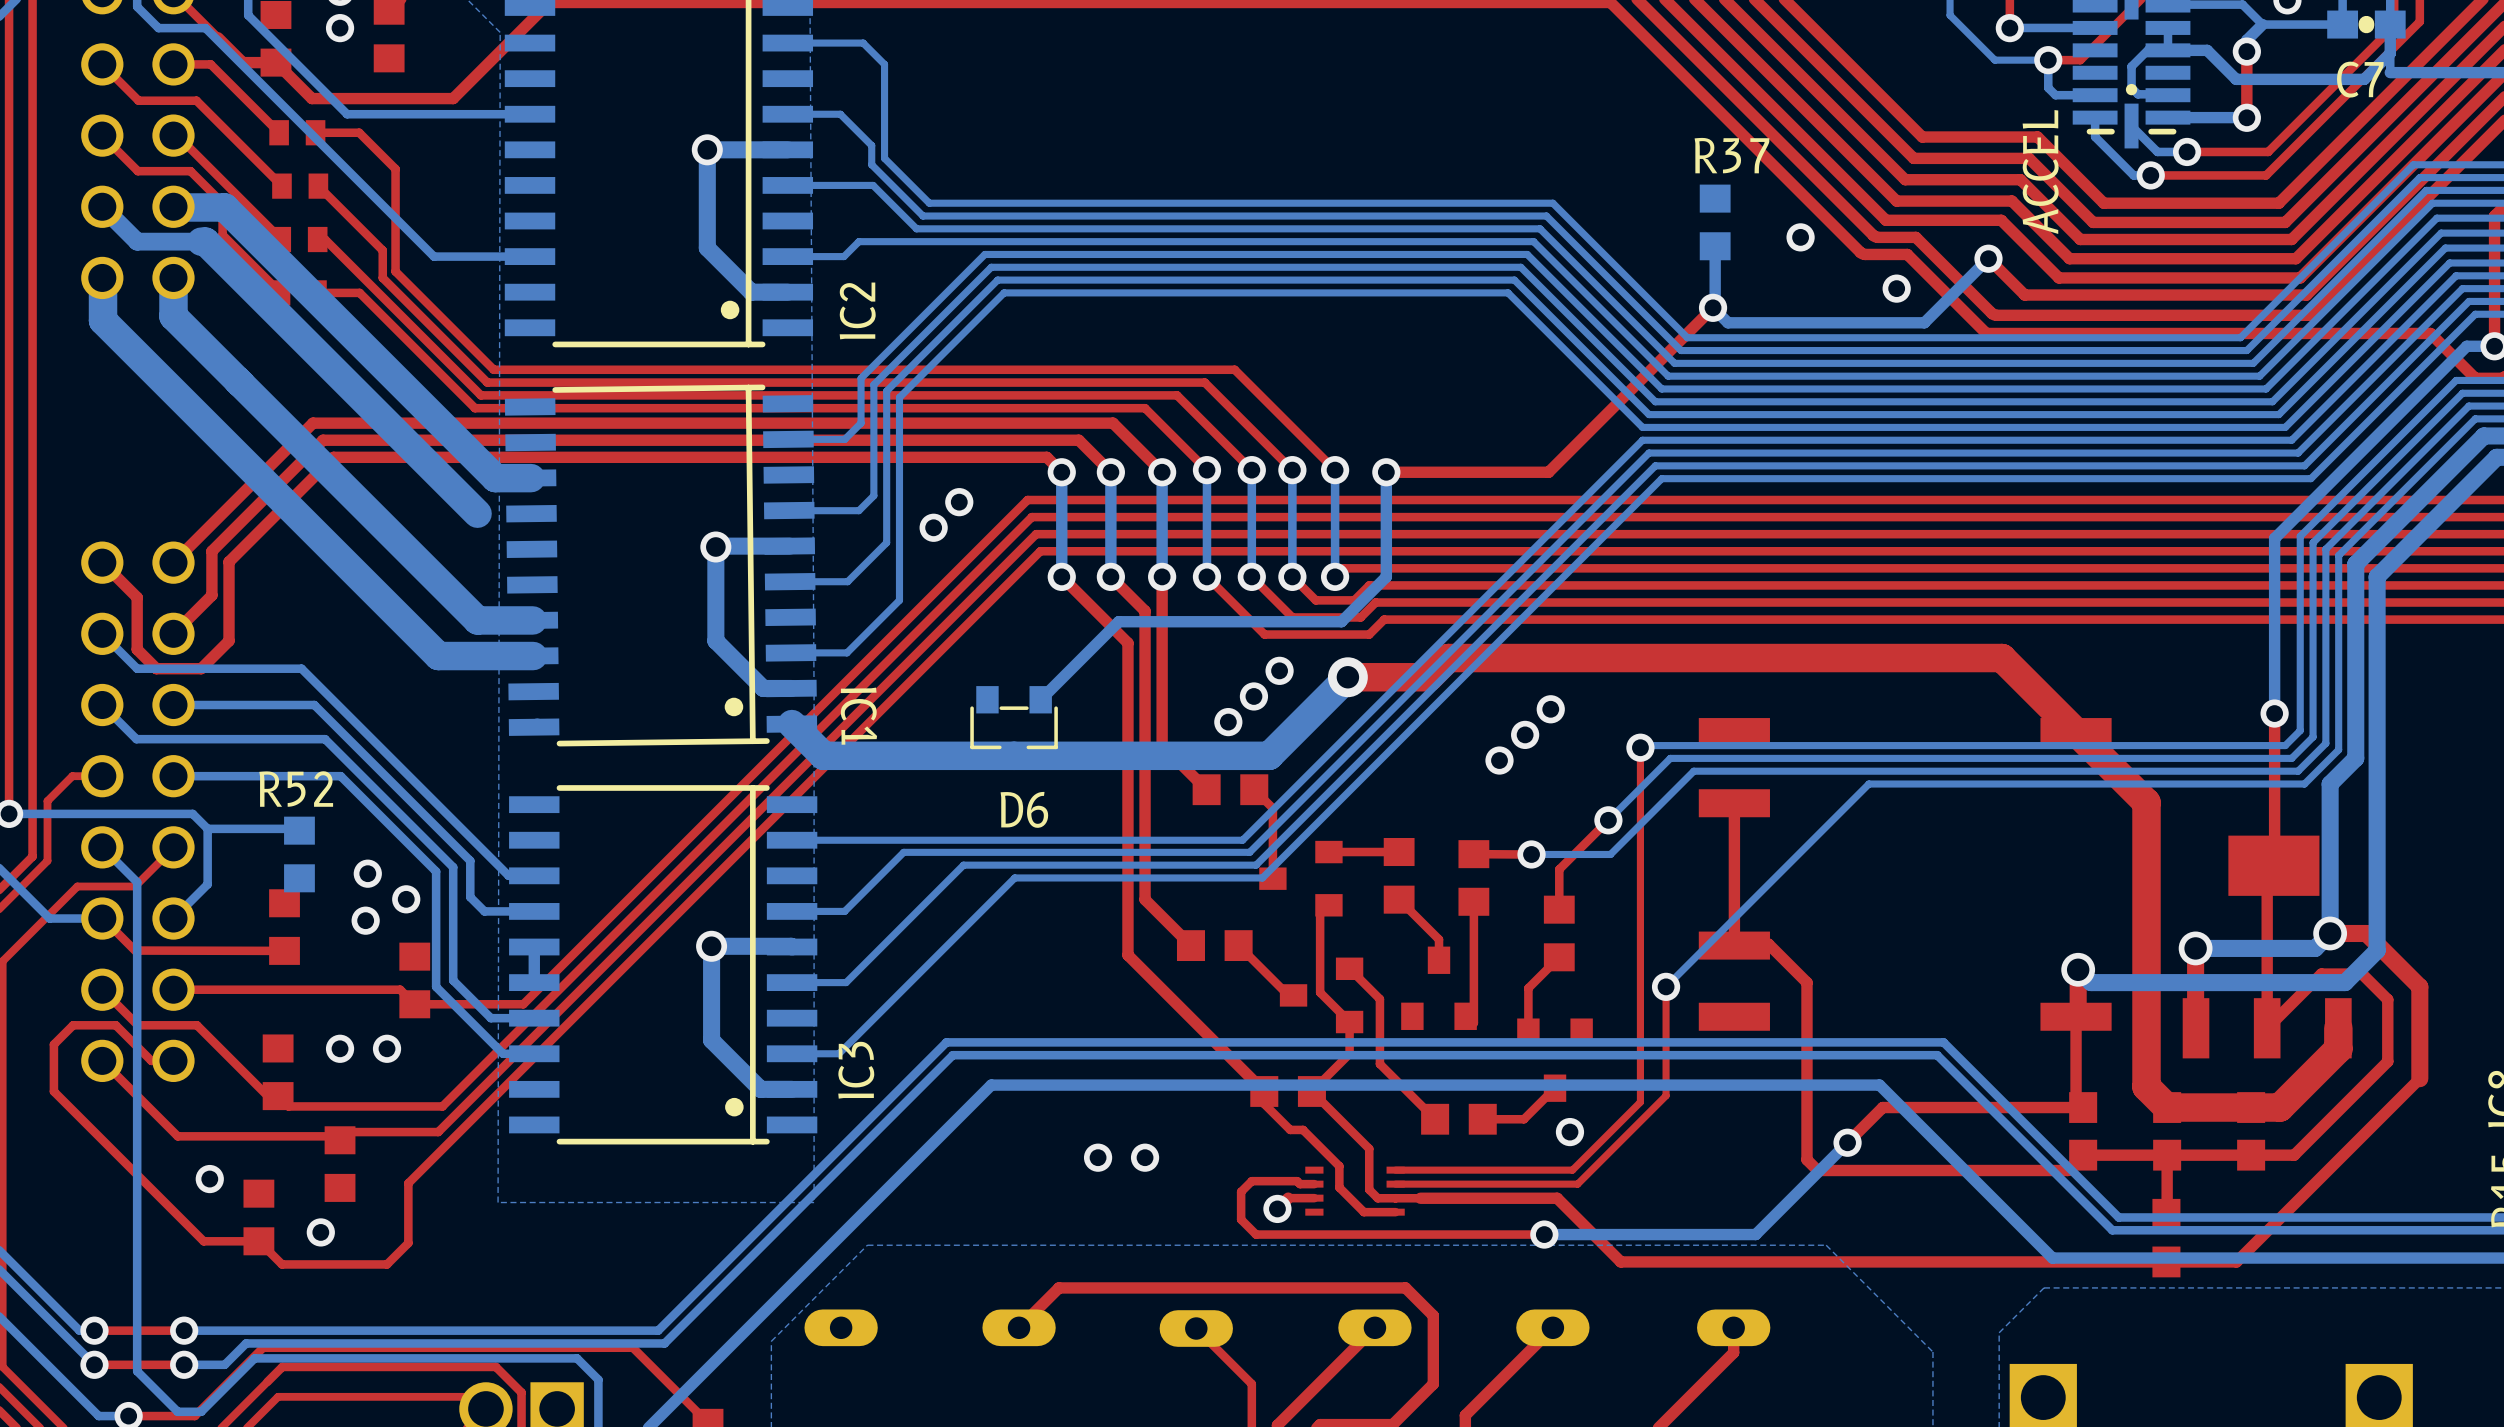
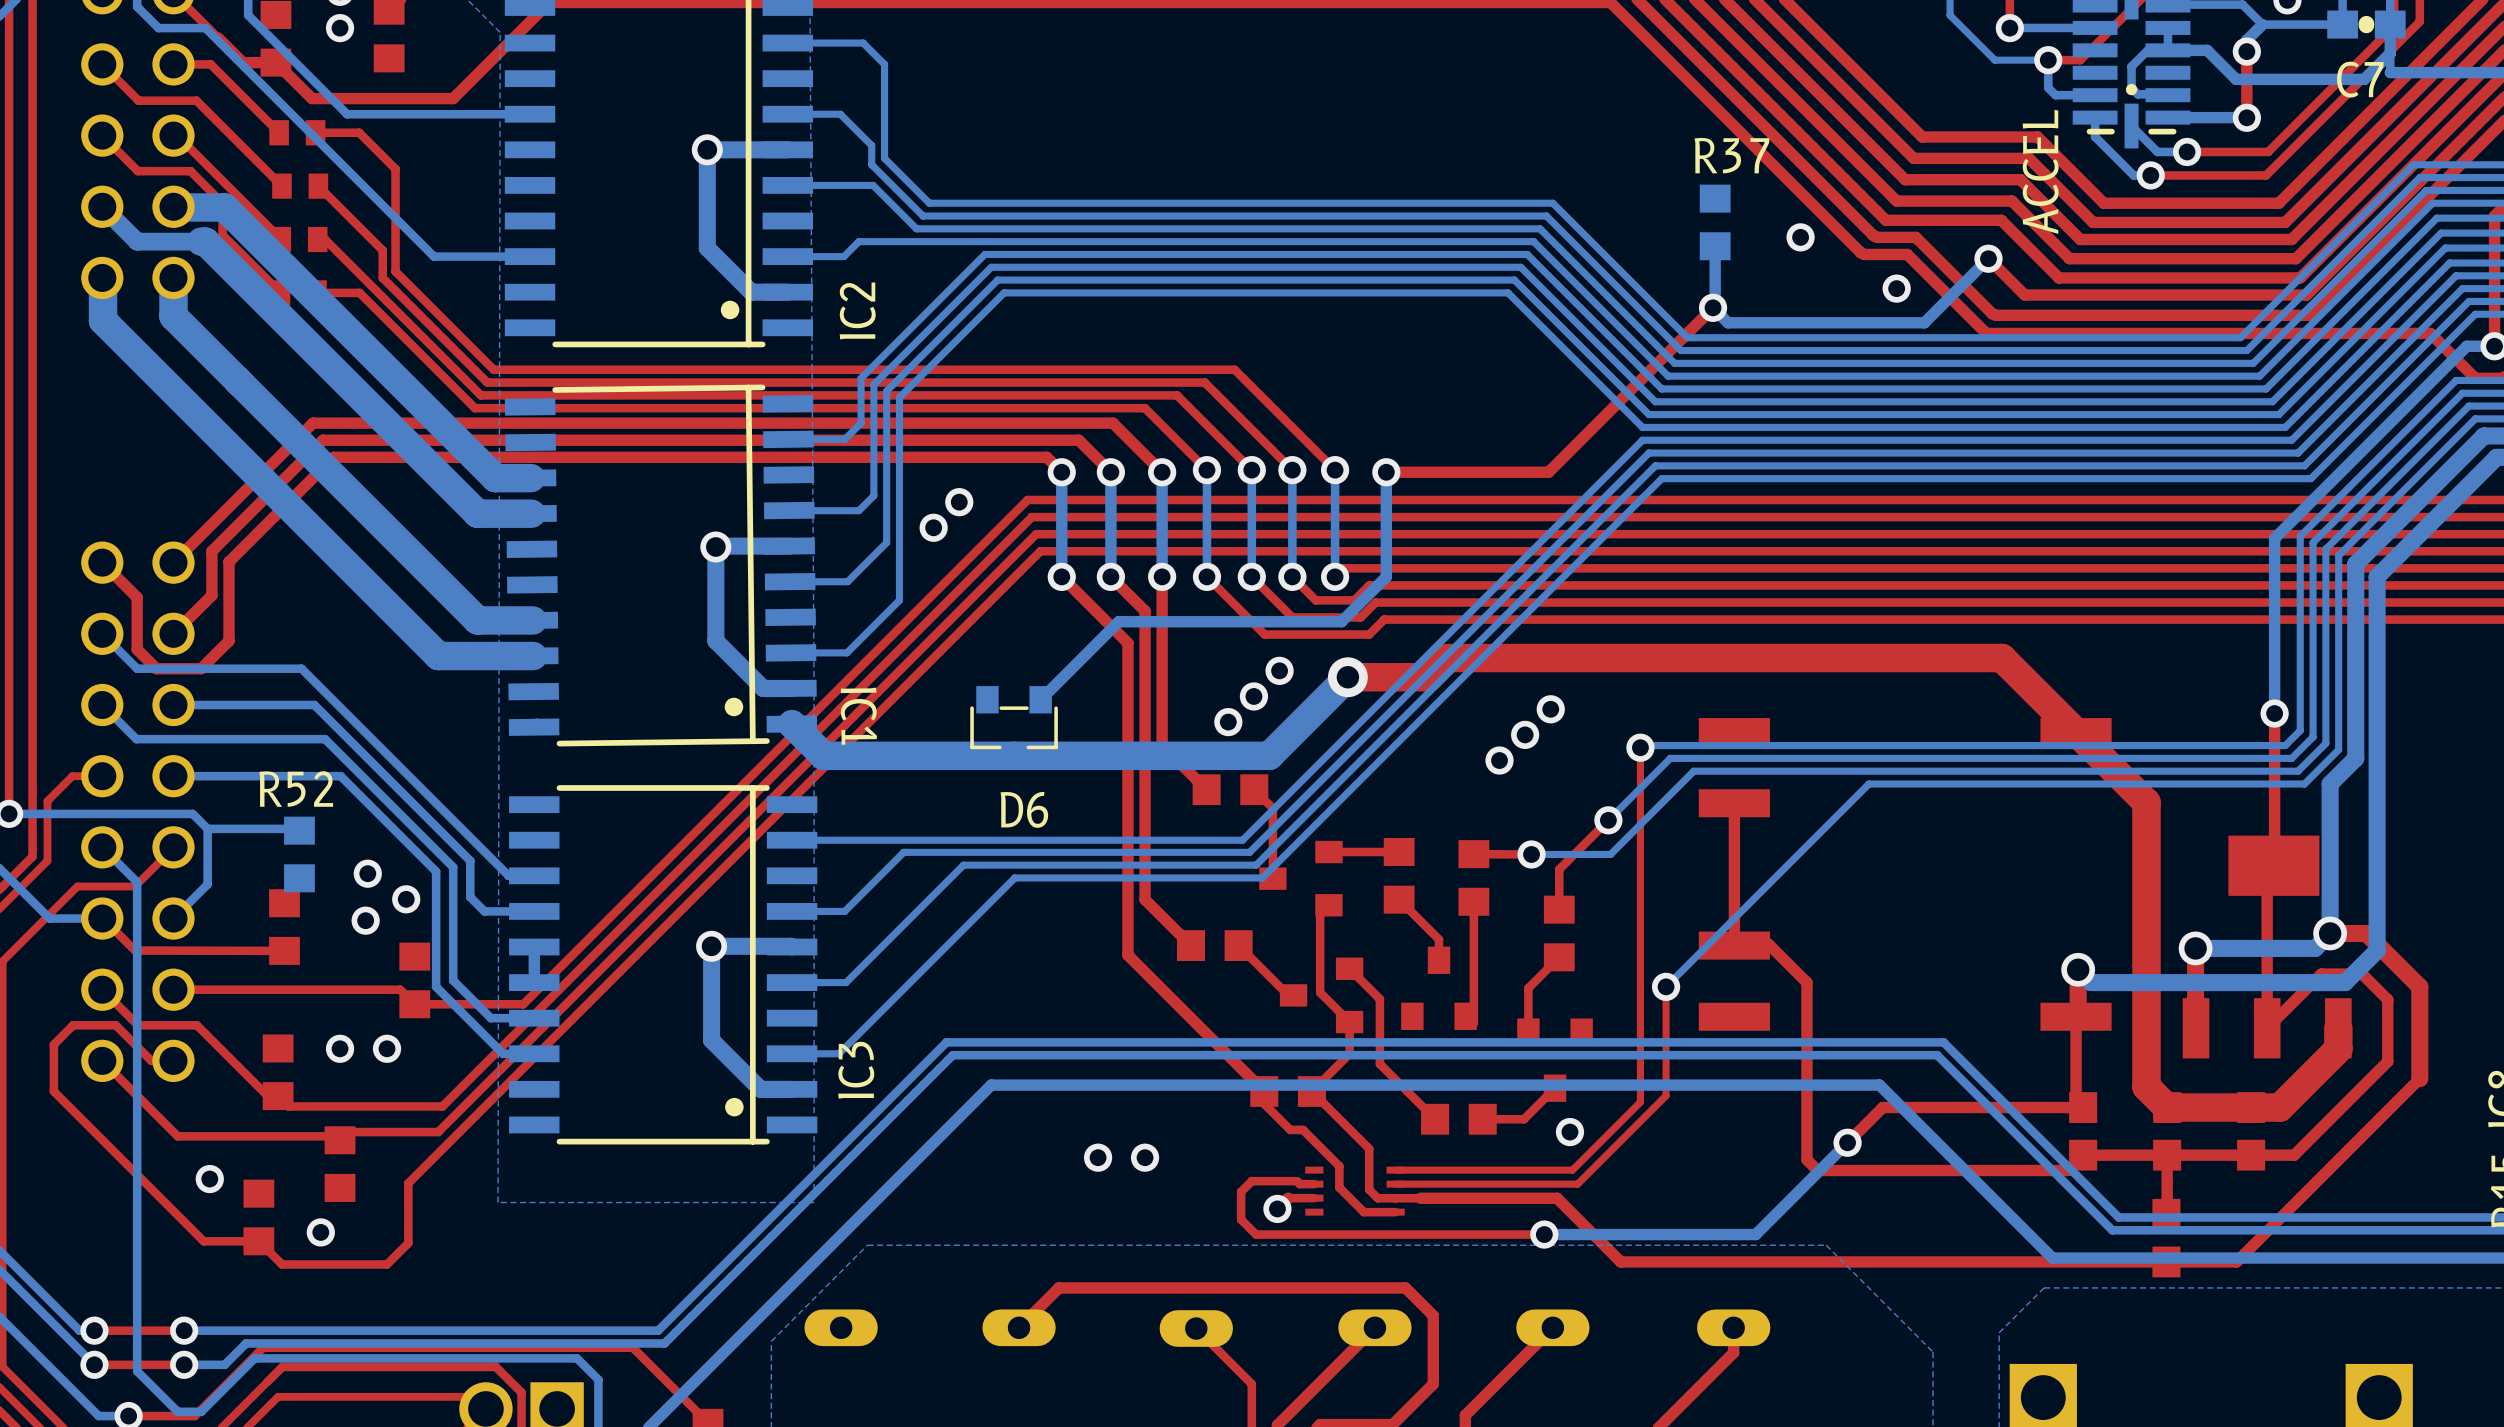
bottom track: none -> (531, 513) (477, 513)

